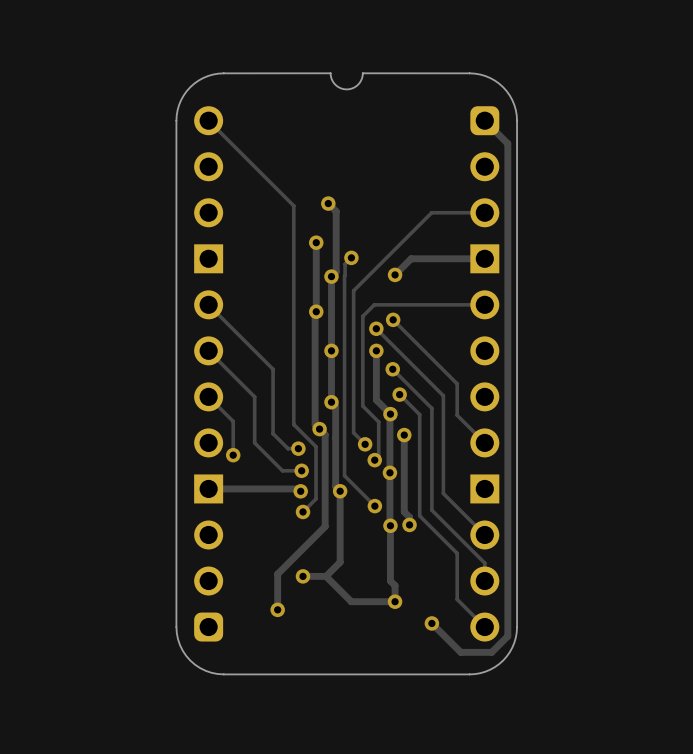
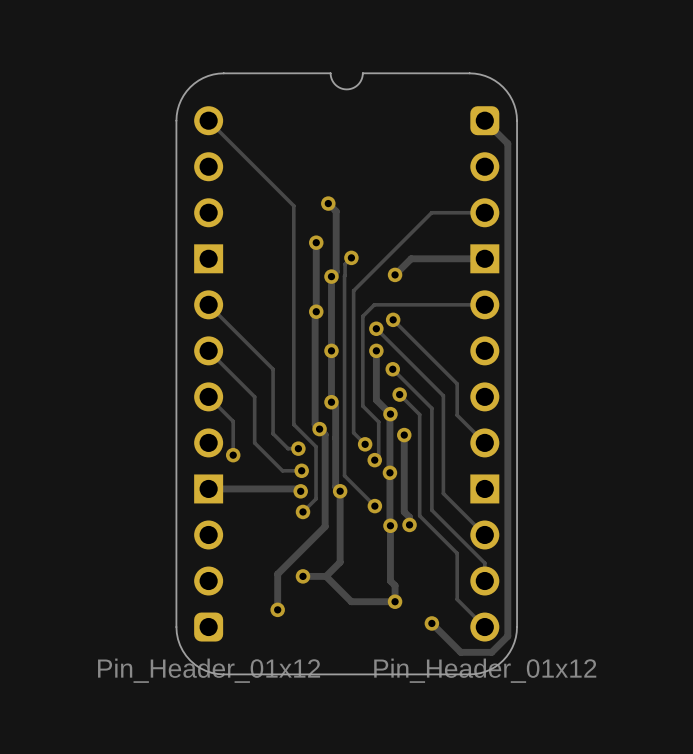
drawing: none -> [98, 658, 597, 683]

